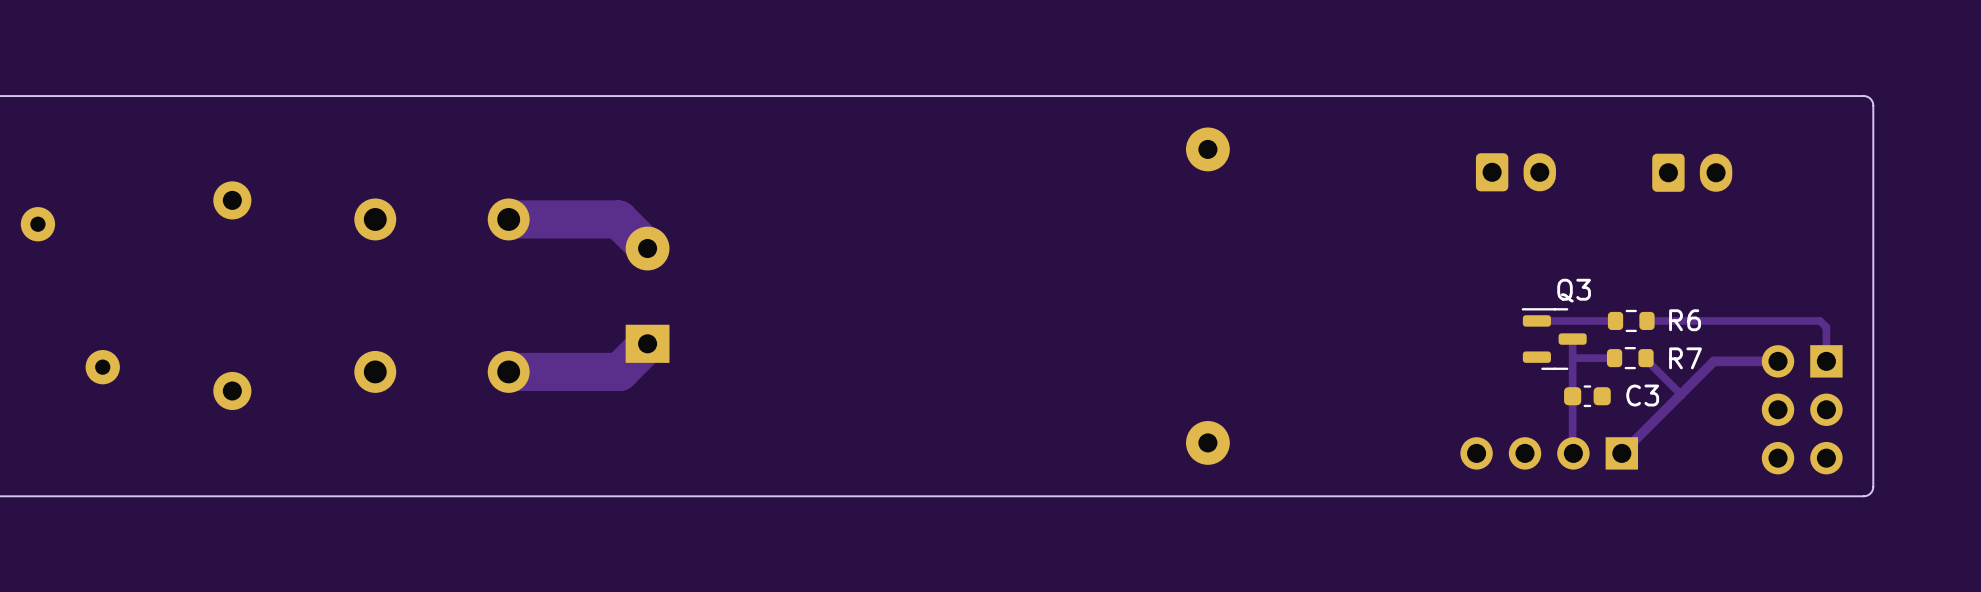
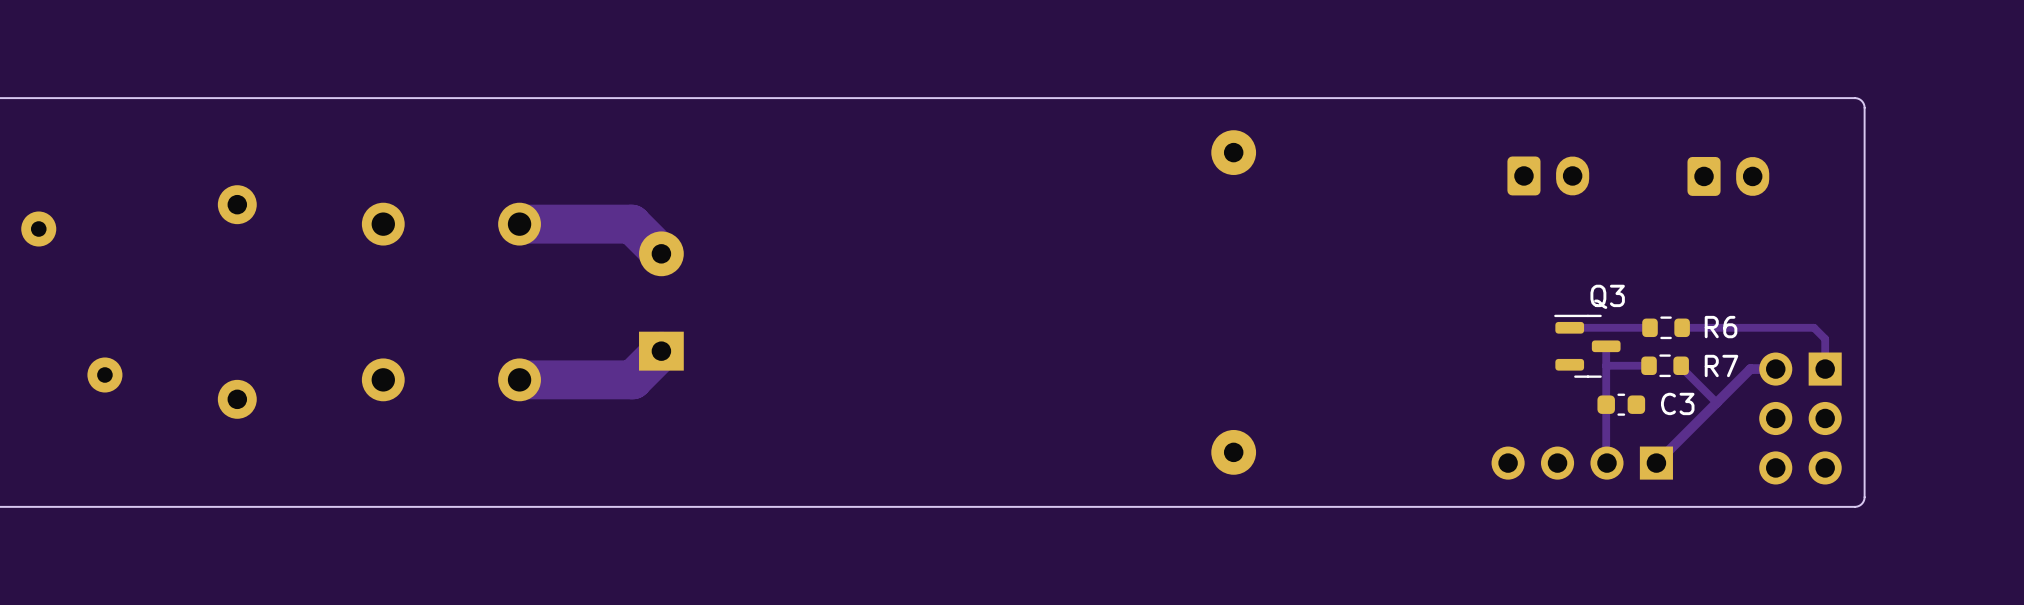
board edge: (1816, 96) (1865, 96) (1870, 98) (1873, 105) (1873, 488) (1870, 493) (1865, 496) (1816, 496) -> (1854, 98) (1861, 100) (1864, 107) (1864, 497) (1861, 504) (1854, 506)
track: (1776, 320) (1819, 320) (1826, 327) (1826, 361) -> (1813, 327) (1825, 338) (1825, 369)
track: (1778, 361) (1738, 361) -> none
part position: (1802, 409) -> (1800, 418)

